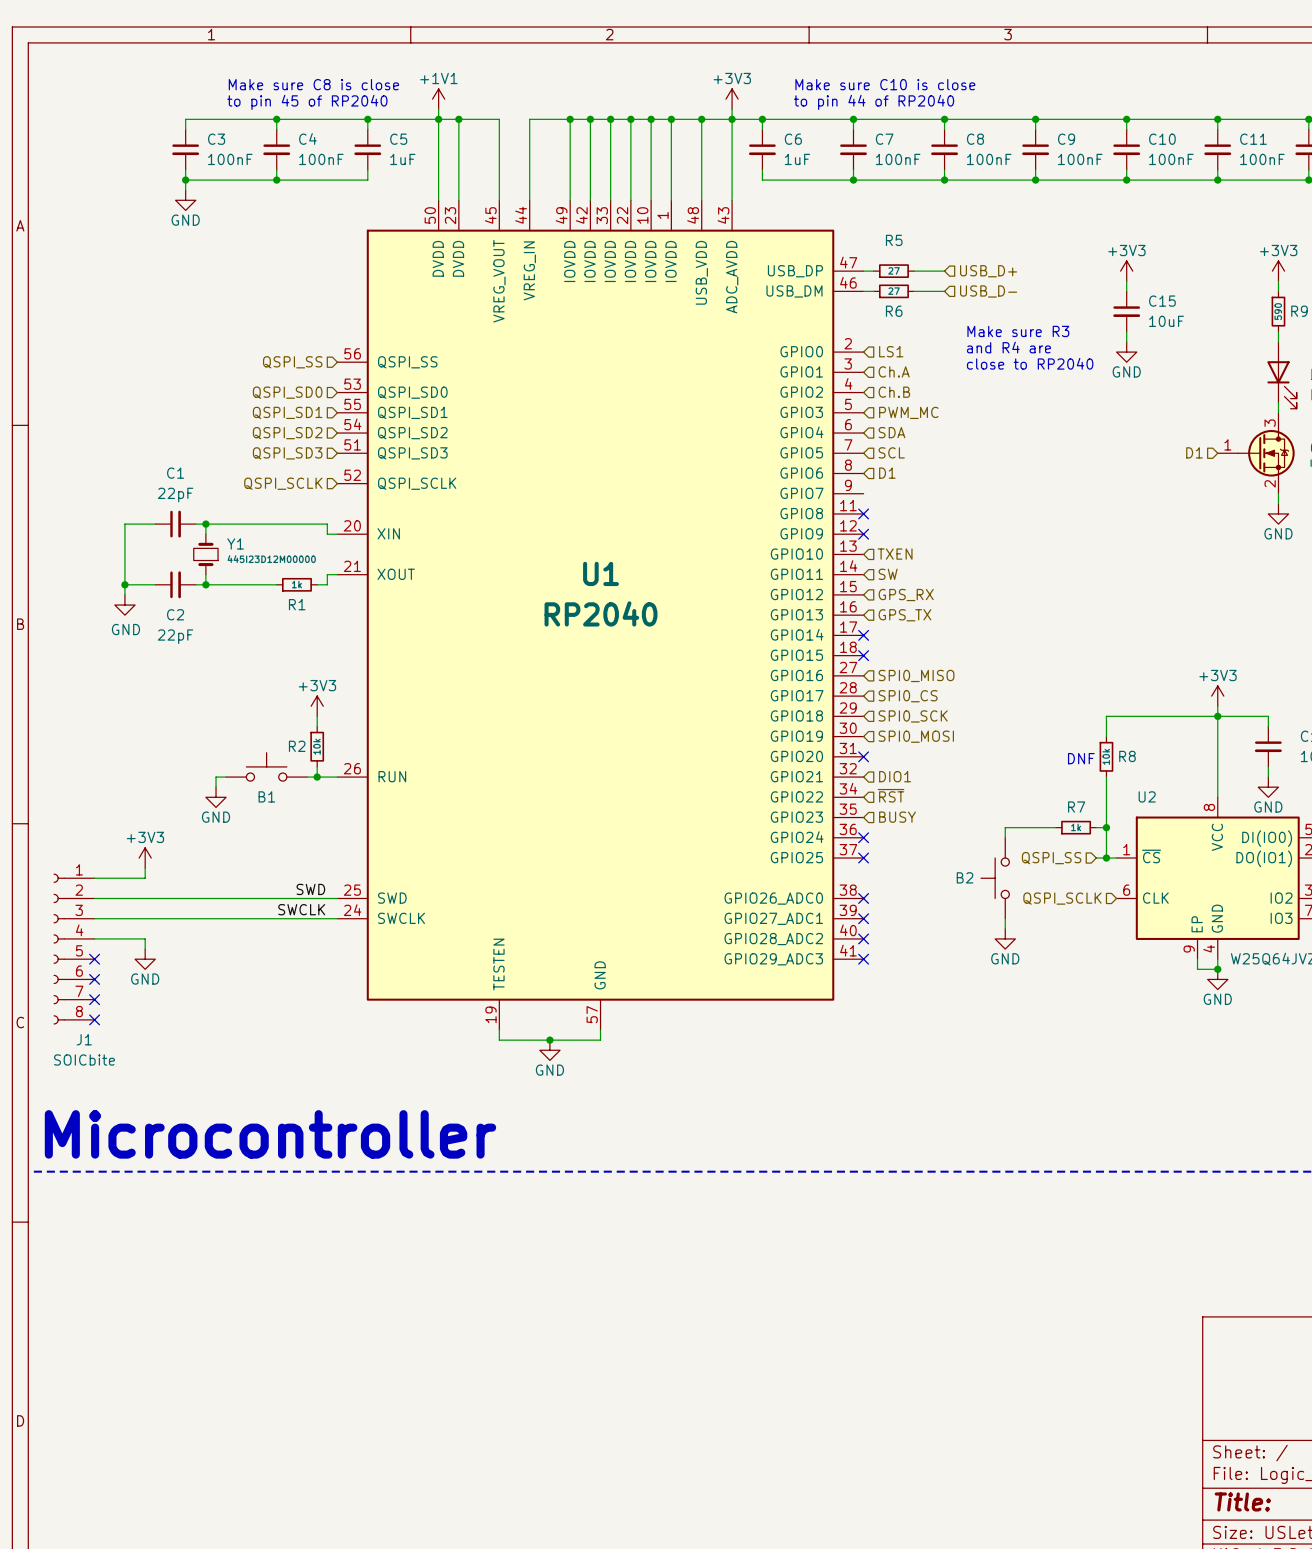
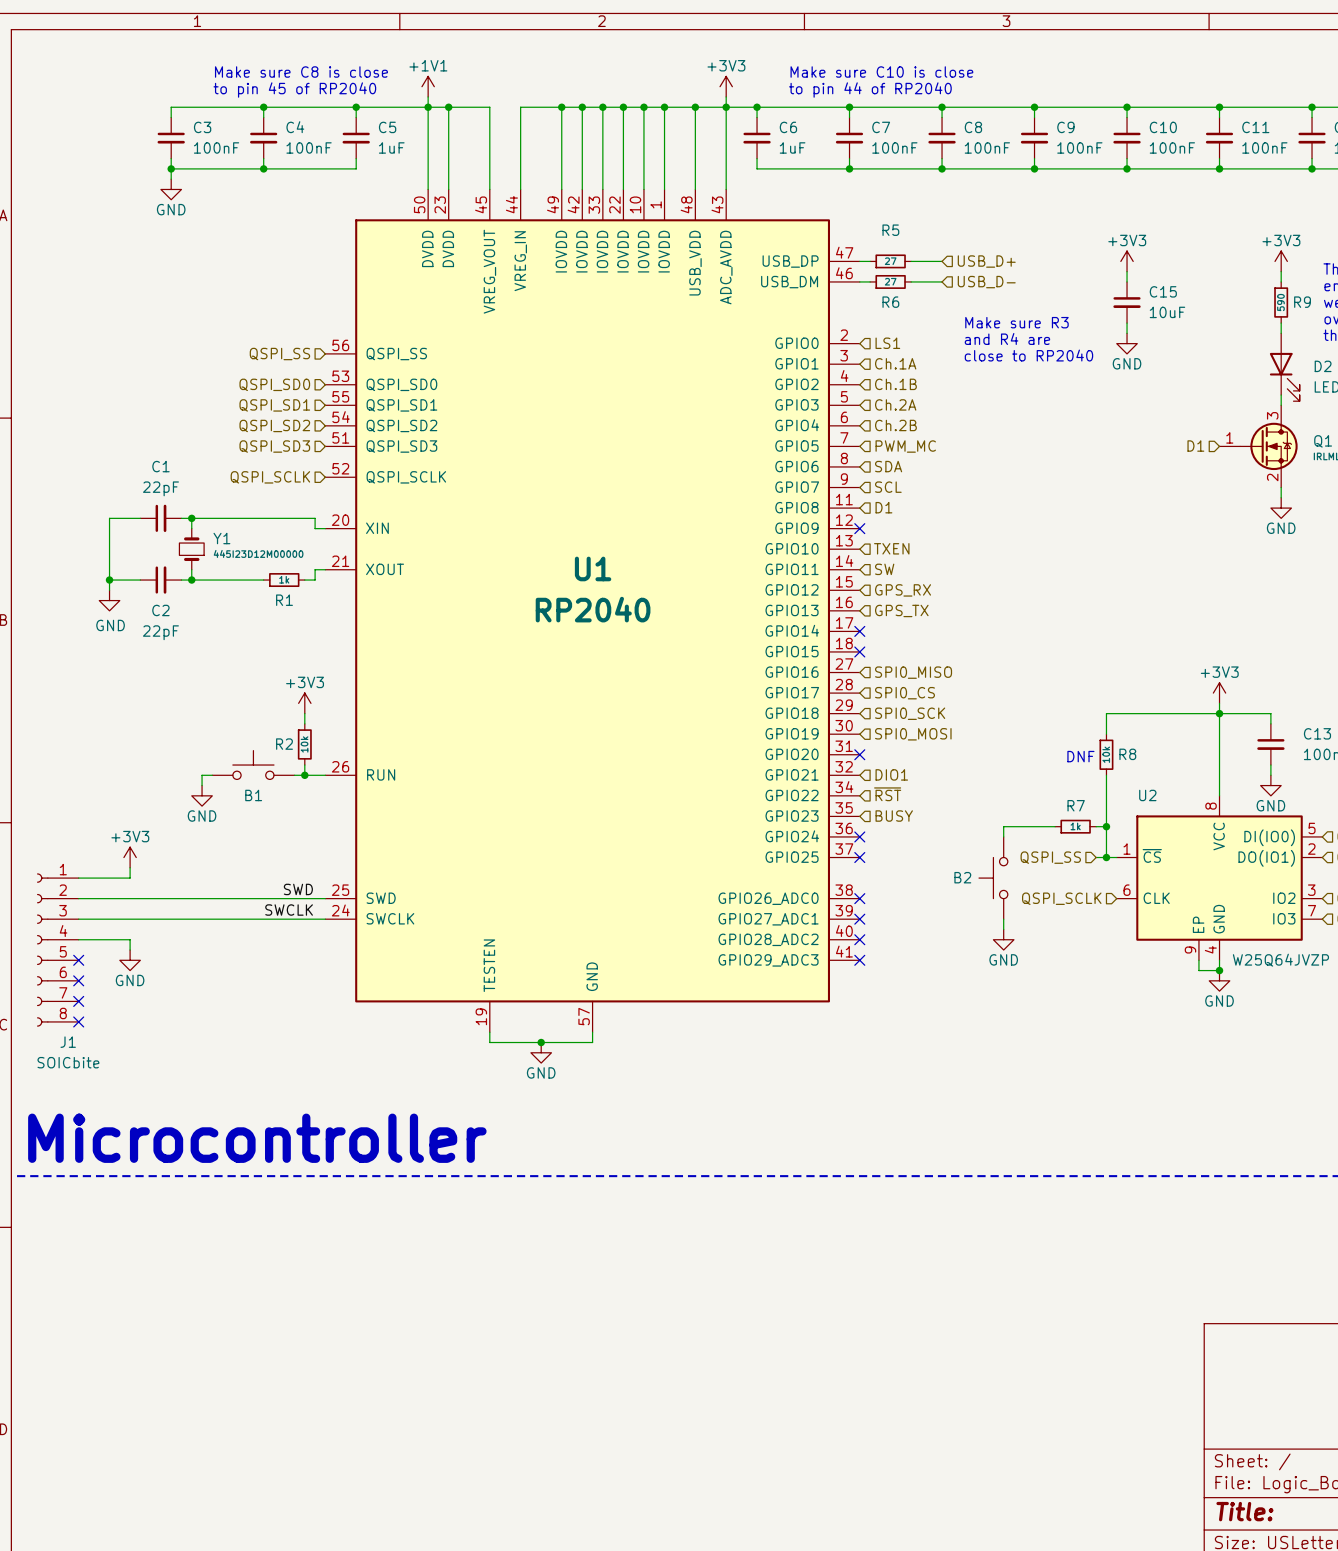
hierarchical label: Ch.A (894, 371) -> Ch.1A (895, 363)
hierarchical label: Ch.B (894, 392) -> Ch.1B (895, 384)
hierarchical label: PWM_MC (908, 412) -> Ch.2A (895, 404)
hierarchical label: SDA (891, 432) -> Ch.2B (895, 425)
hierarchical label: SCL (891, 452) -> PWM_MC (905, 446)
hierarchical label: D1 (887, 473) -> SDA (888, 466)
hierarchical label: none -> SCL (888, 487)
no-connect mark: (863, 513) -> none
hierarchical label: none -> D1 (883, 507)

